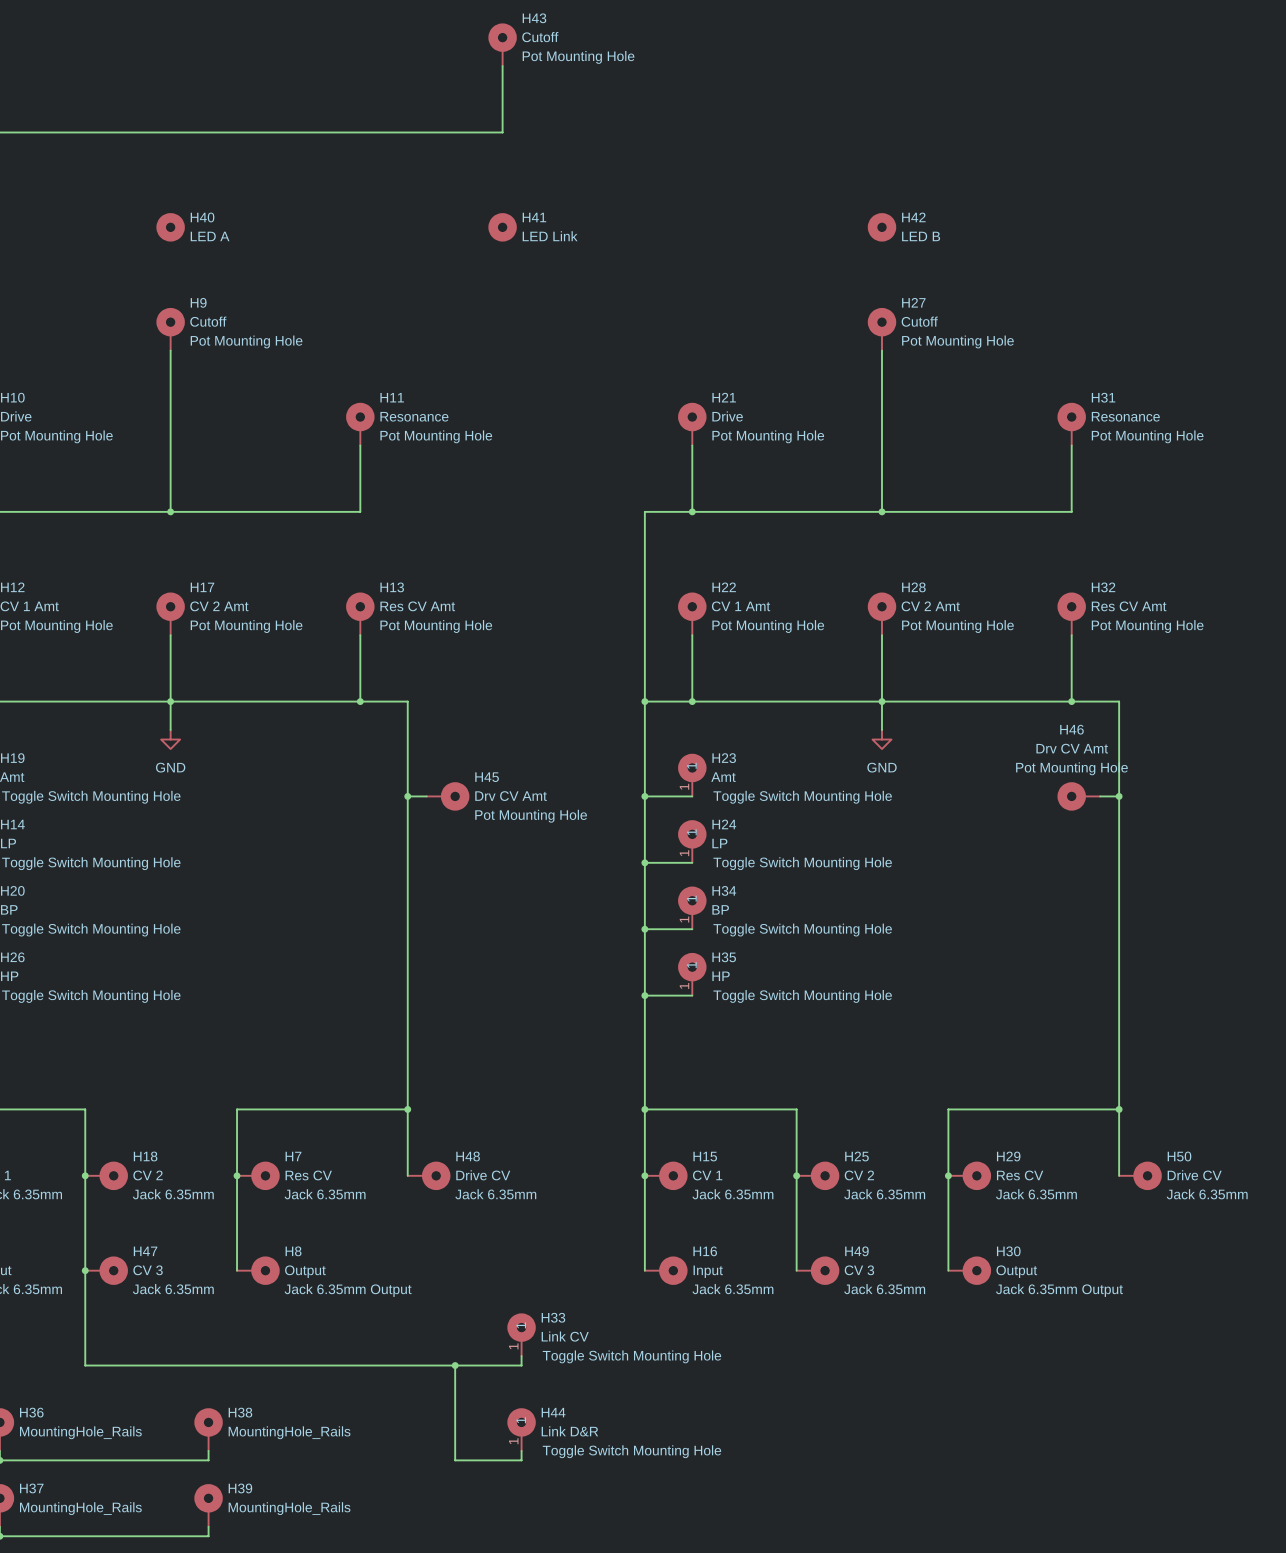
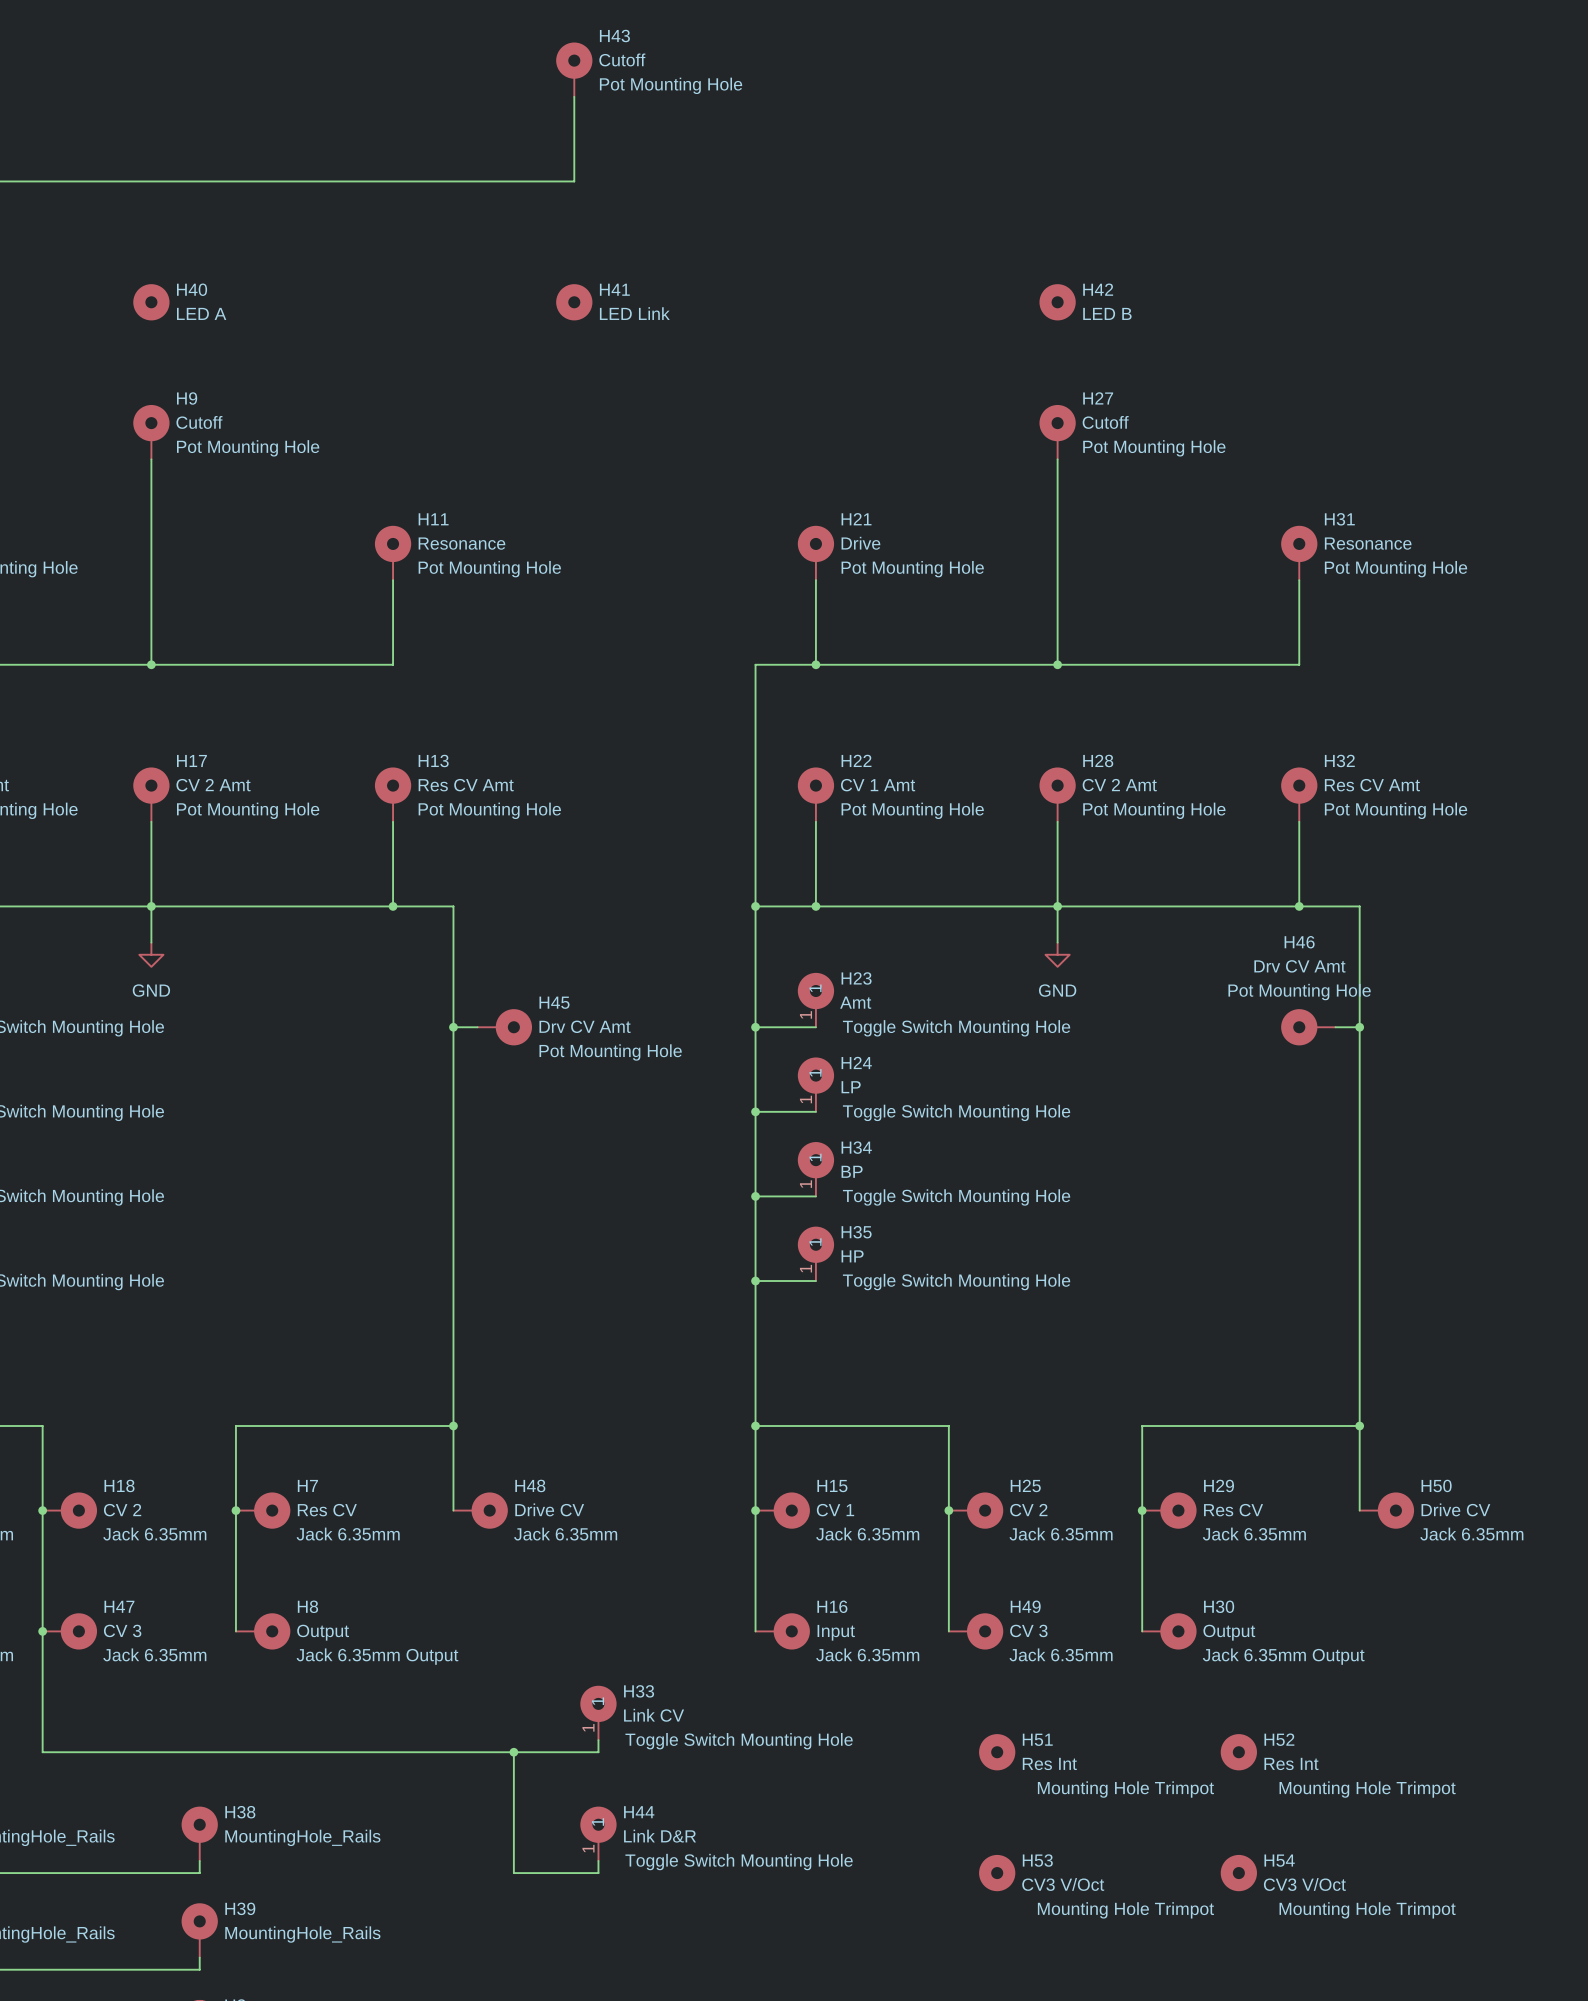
H51: none -> Res Int (997, 1752)
H52: none -> Res Int (1238, 1752)
H53: none -> CV3 V/Oct (997, 1873)
H54: none -> CV3 V/Oct (1238, 1873)

